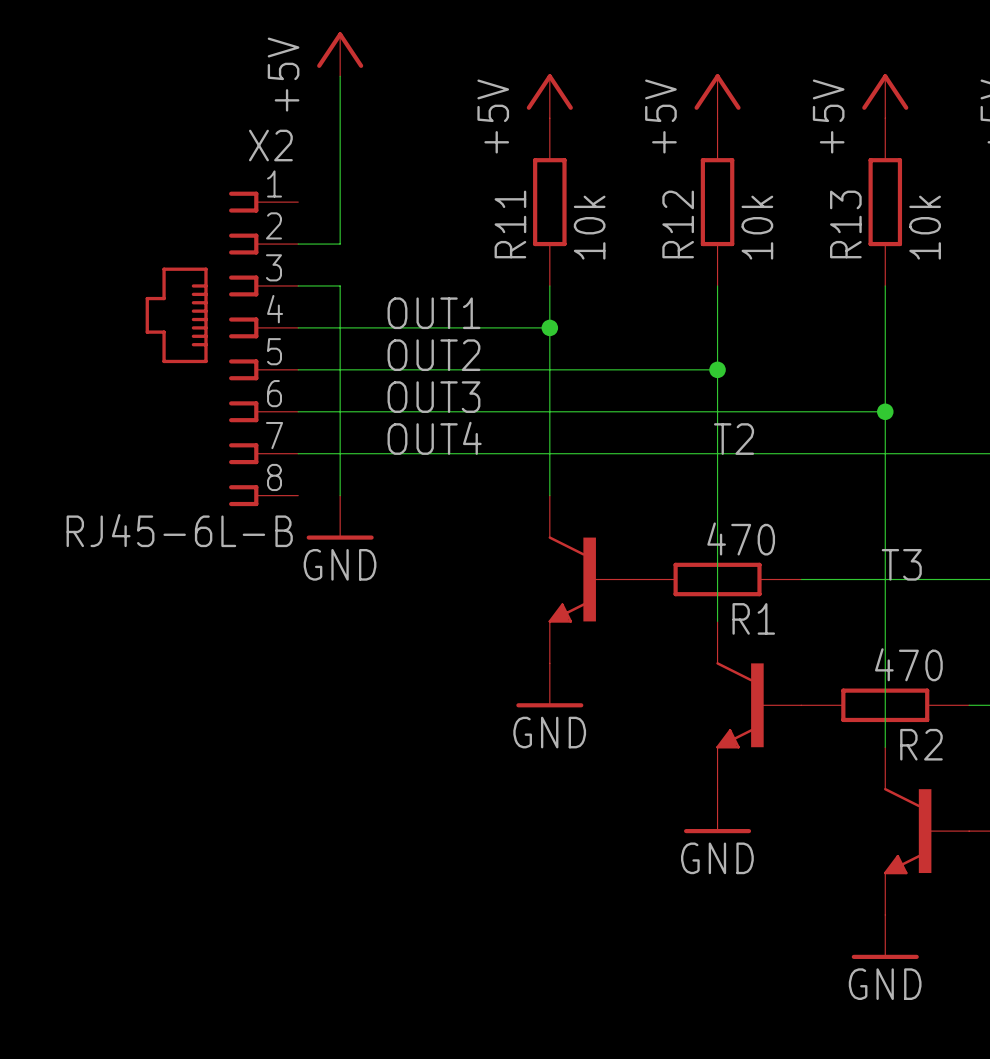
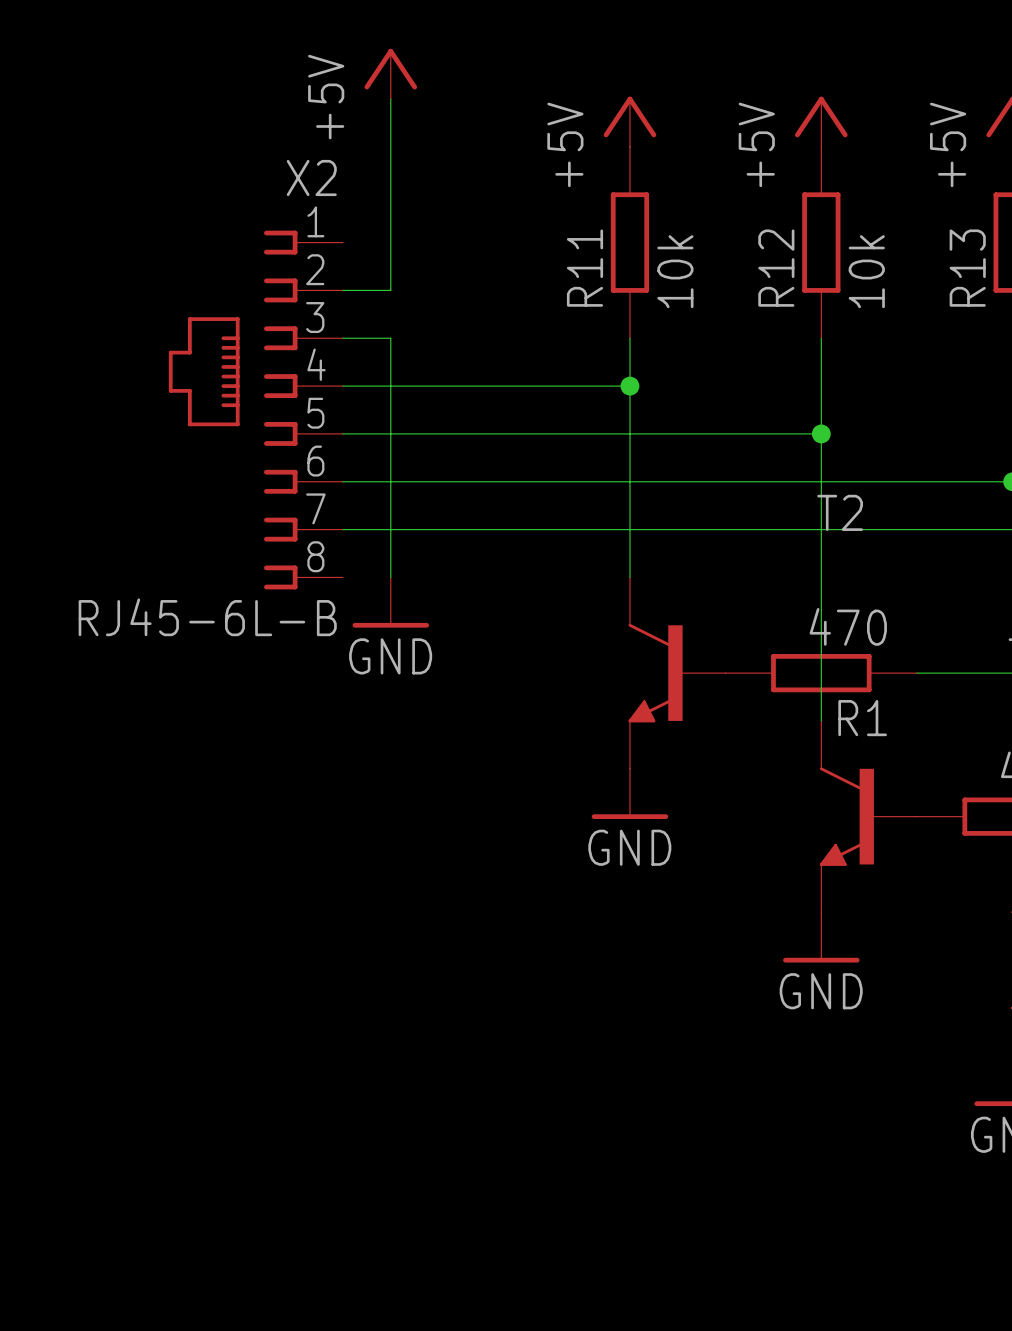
label: OUT1 (433, 313) -> none
label: OUT2 (433, 355) -> none
label: OUT3 (433, 397) -> none
label: OUT4 (434, 438) -> none

